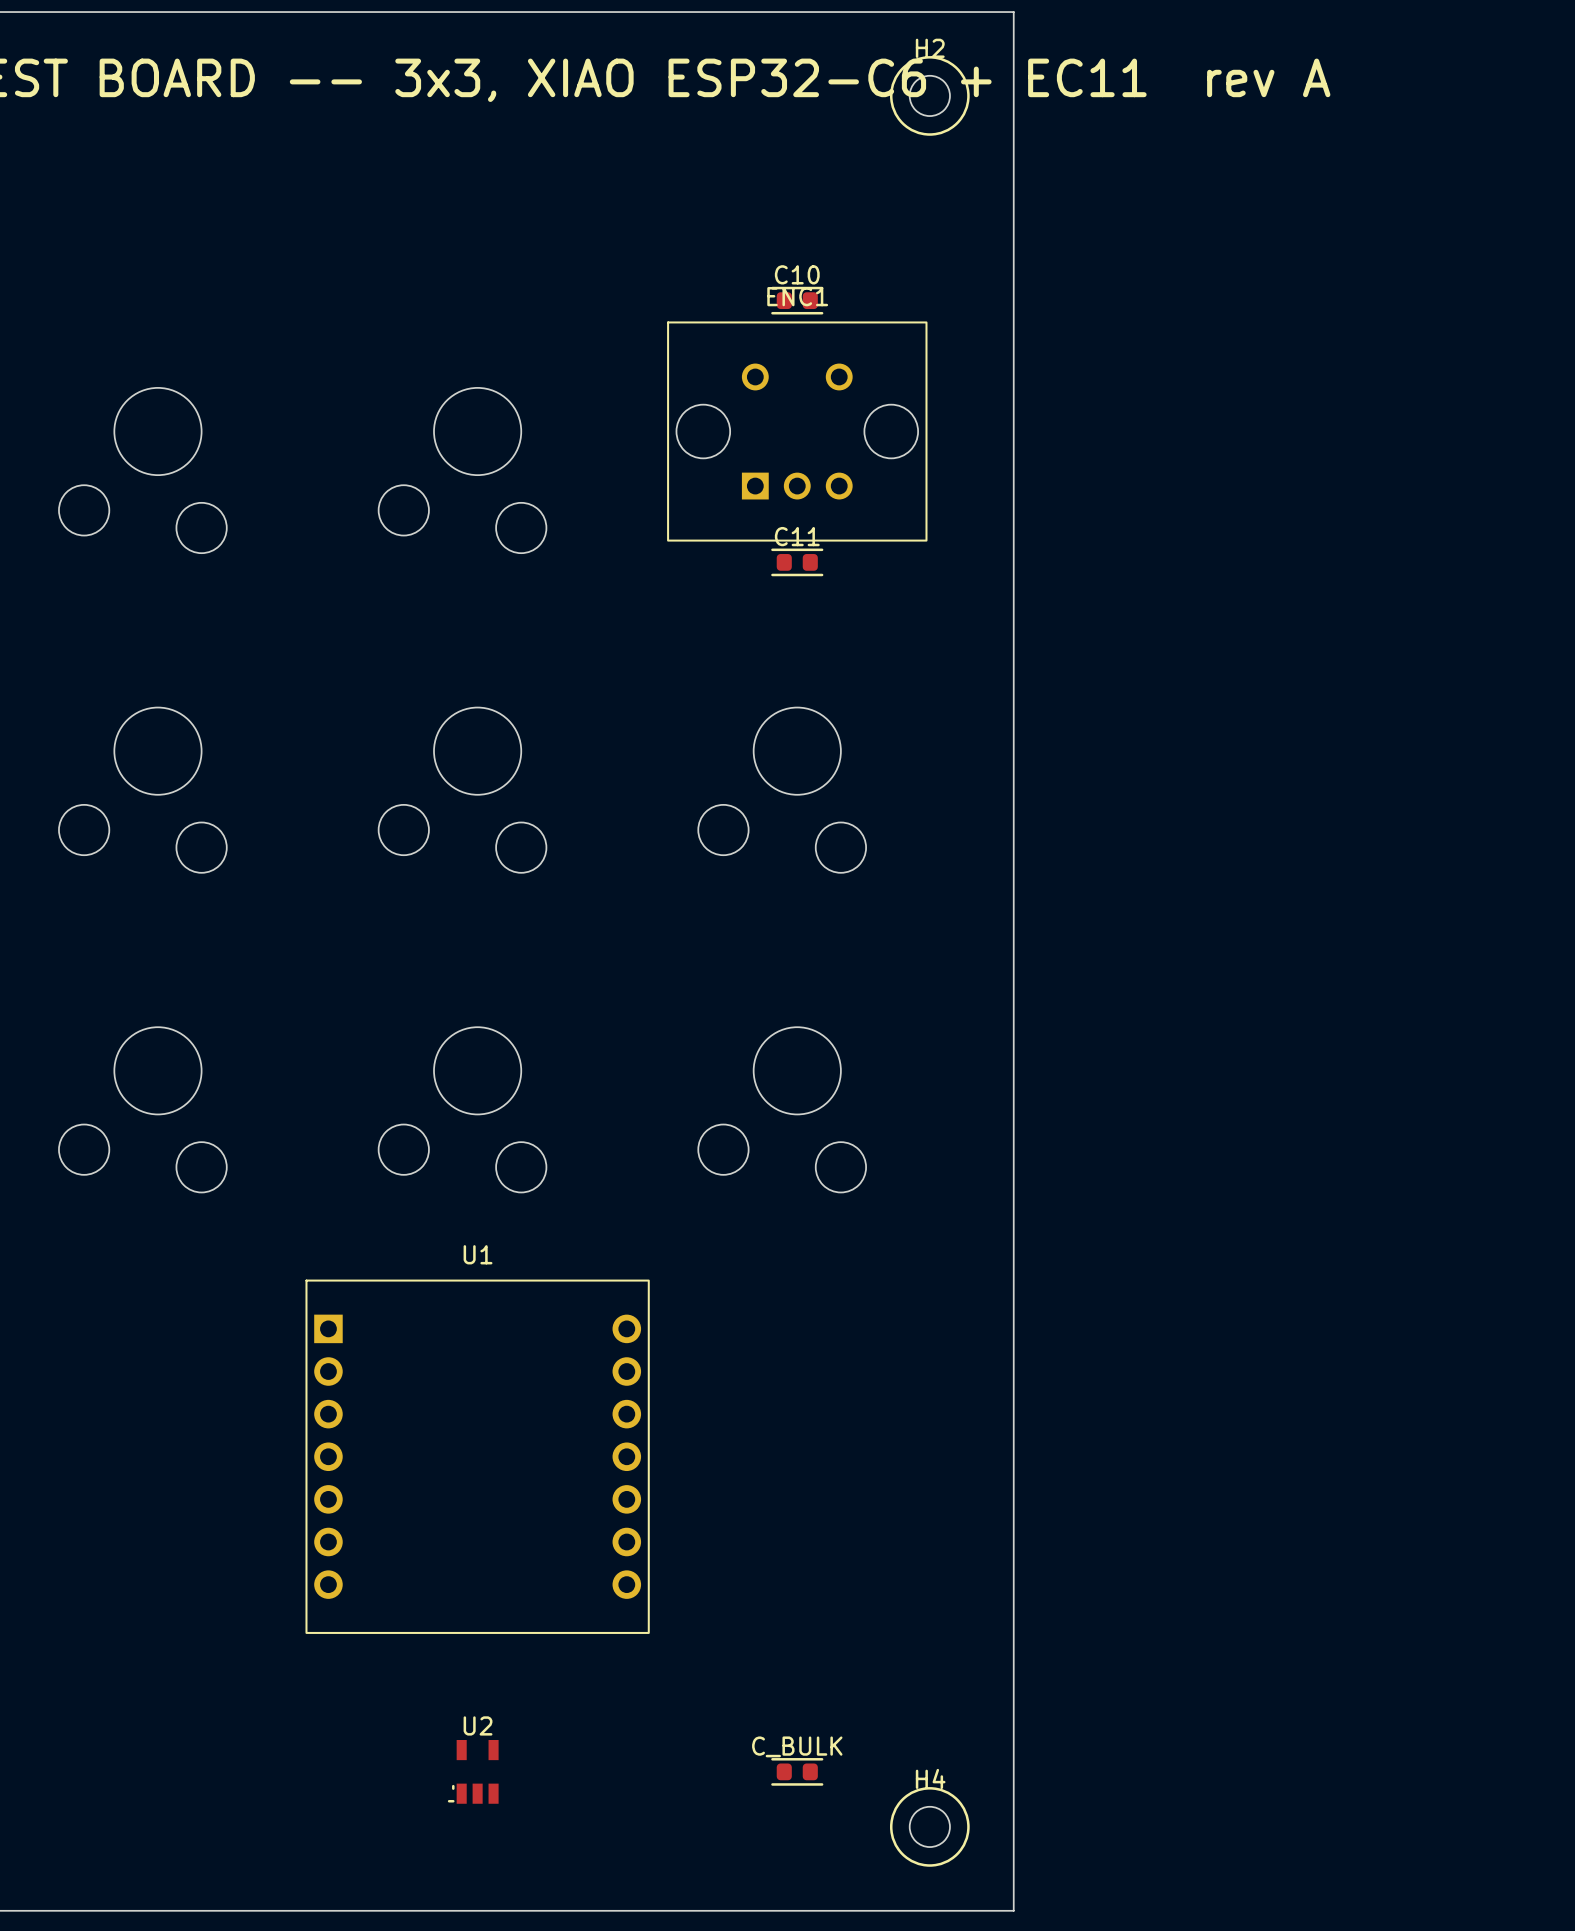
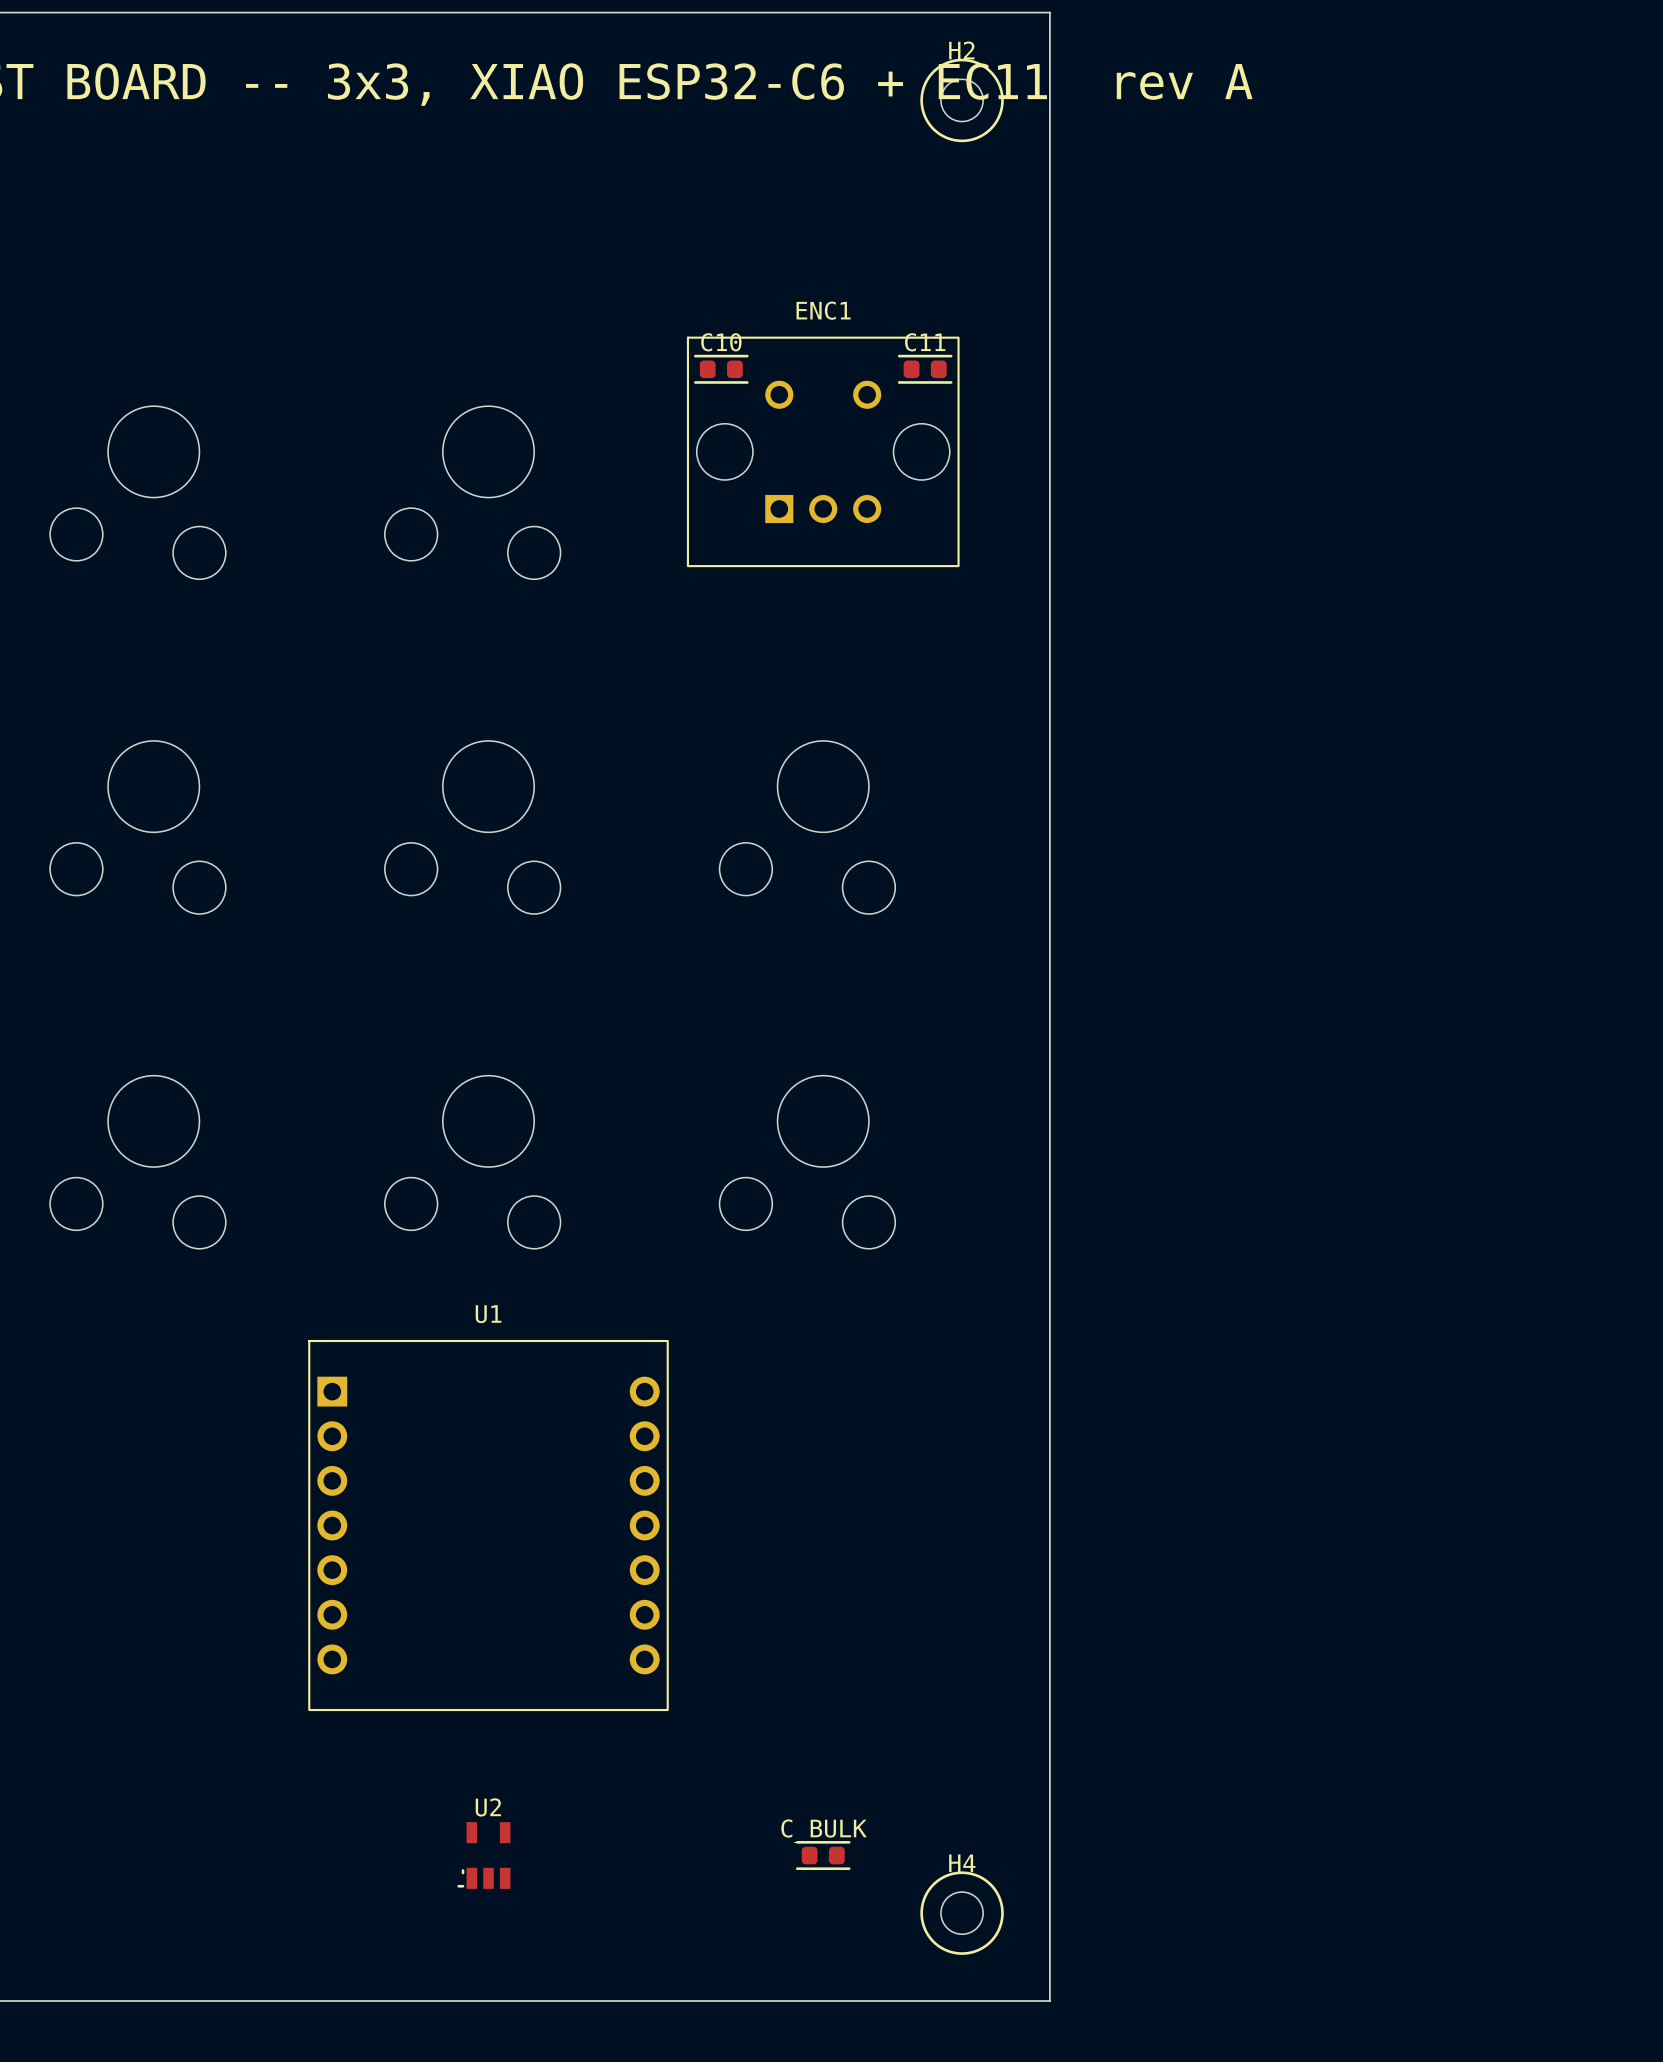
C10 position: (797, 300) -> (721, 369)
C11 position: (797, 562) -> (925, 369)

